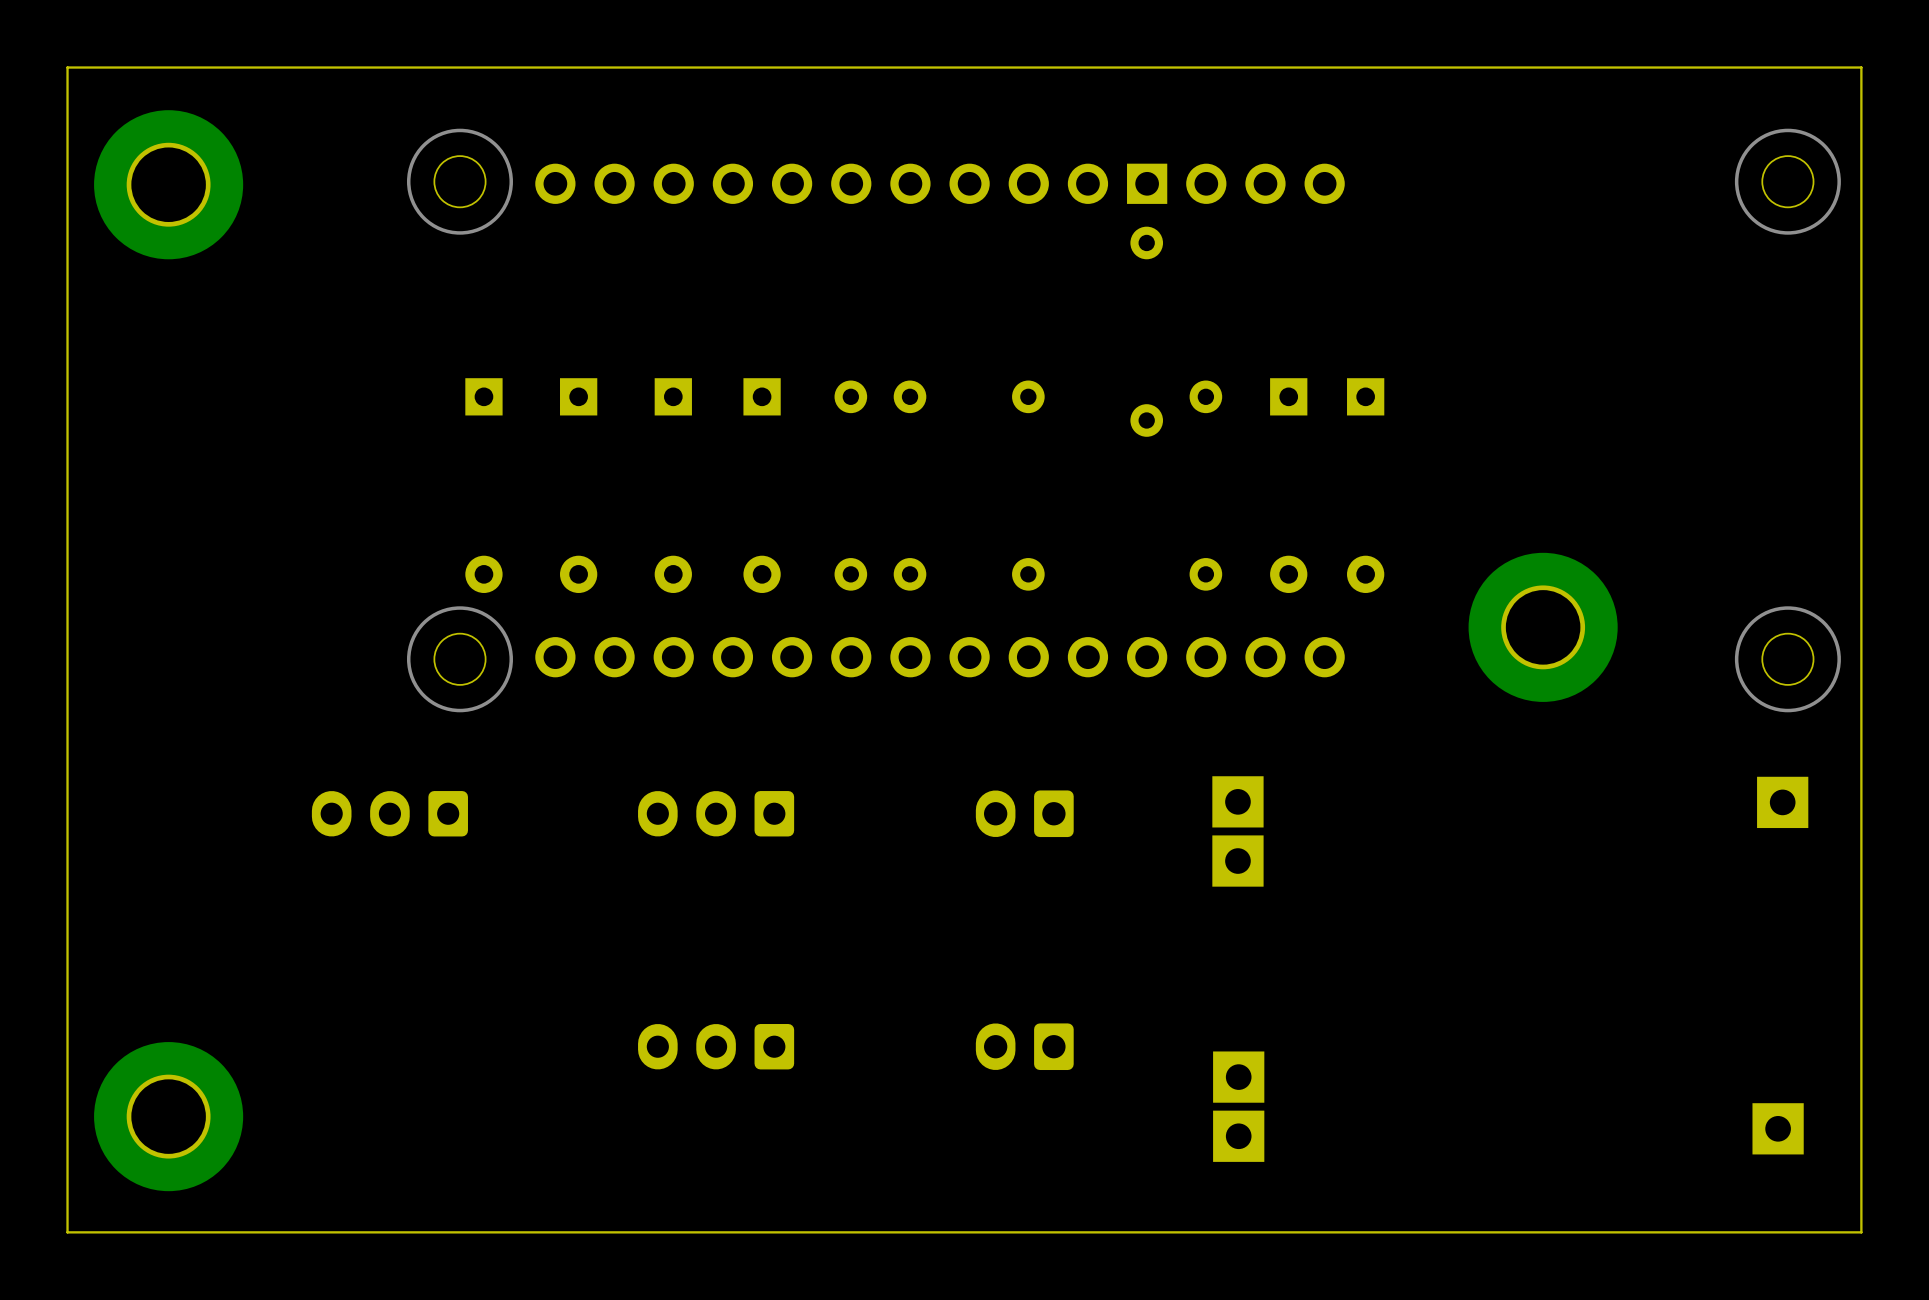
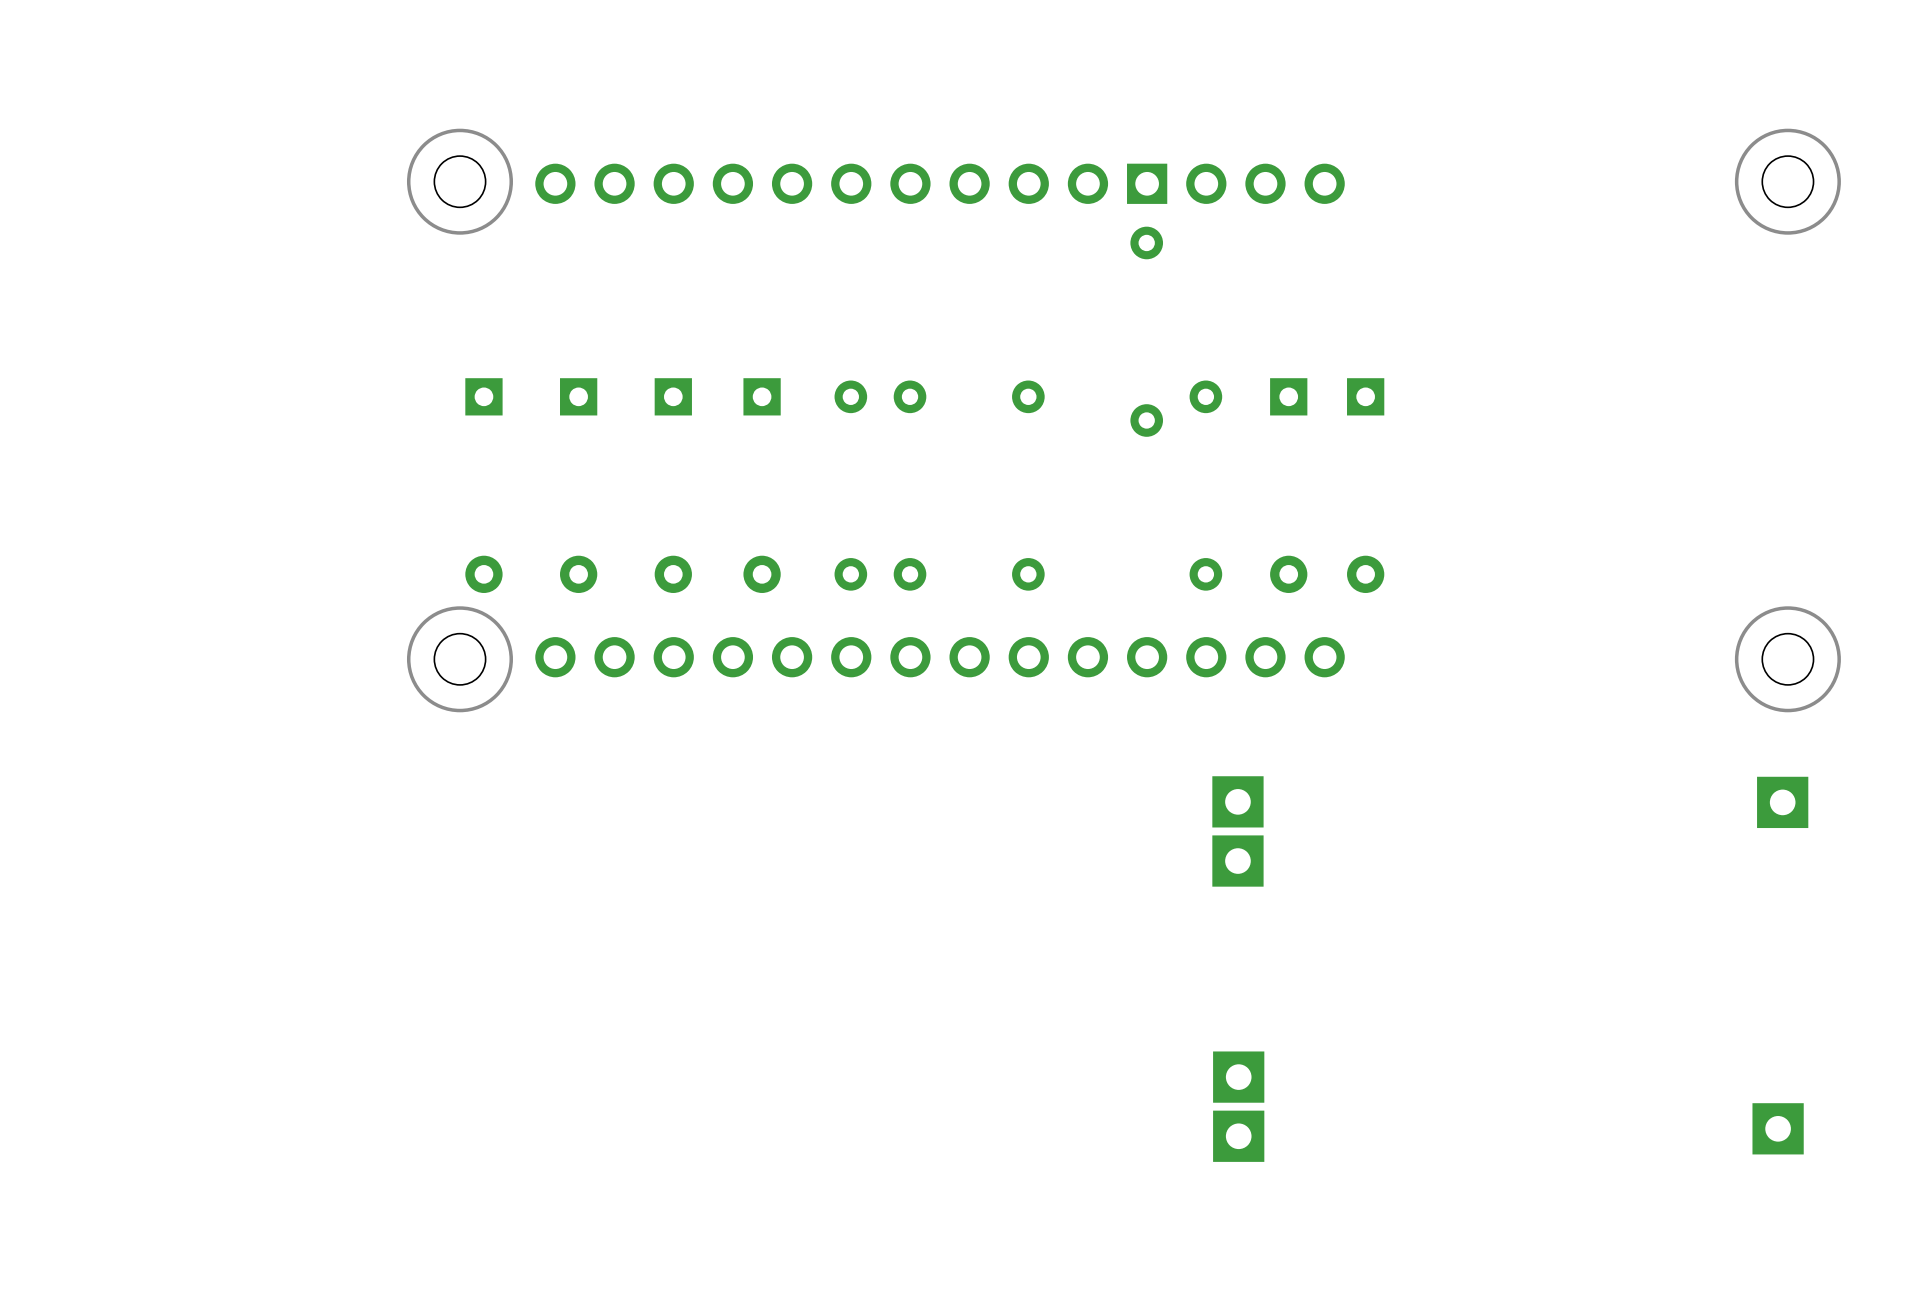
board edge: (1861, 67) (67, 67) (67, 1232) (1861, 1232) (1861, 67) -> none
part: (168, 184) -> none
part: (1543, 627) -> none
part: (389, 813) -> none
part: (716, 813) -> none
part: (1024, 813) -> none
part: (716, 1046) -> none
part: (1024, 1046) -> none
part: (168, 1116) -> none

